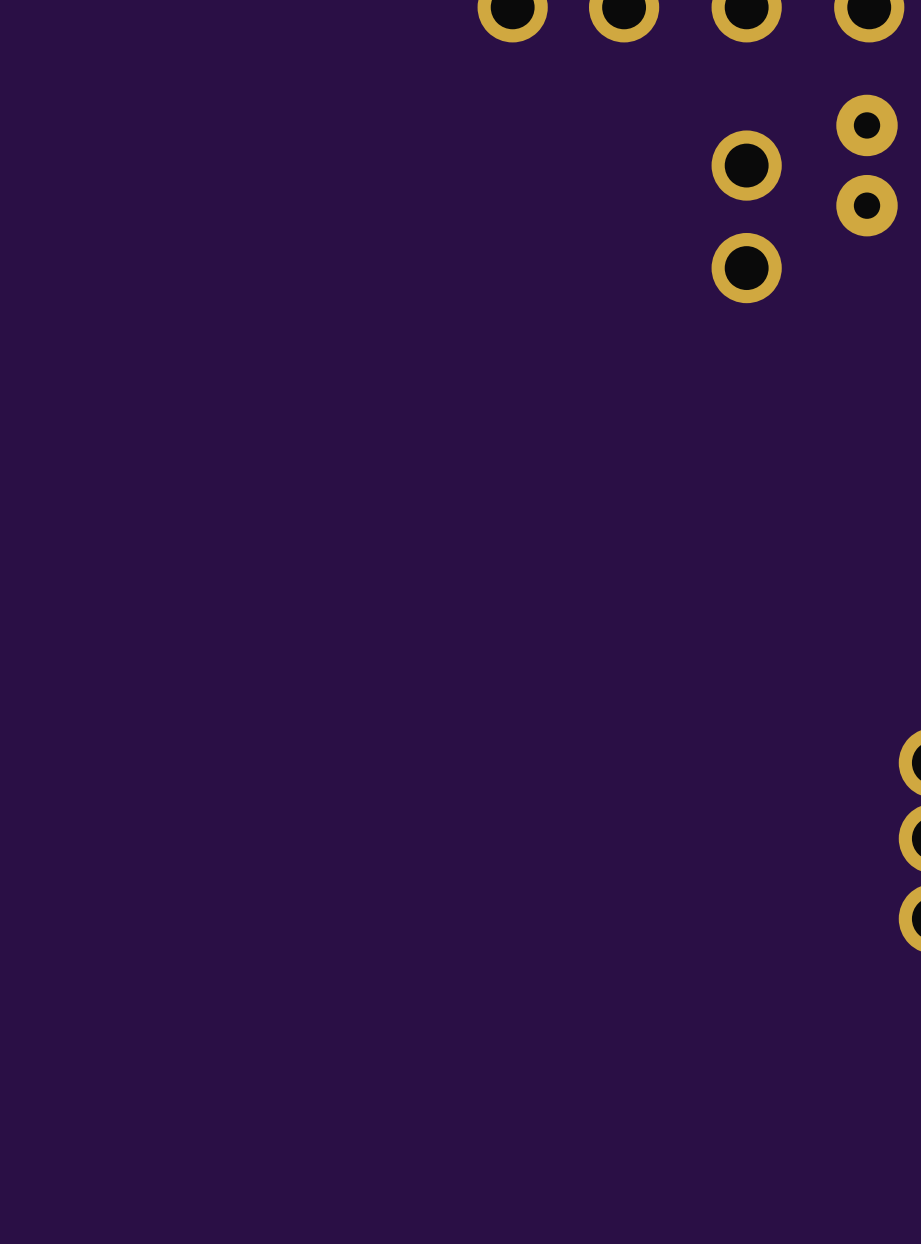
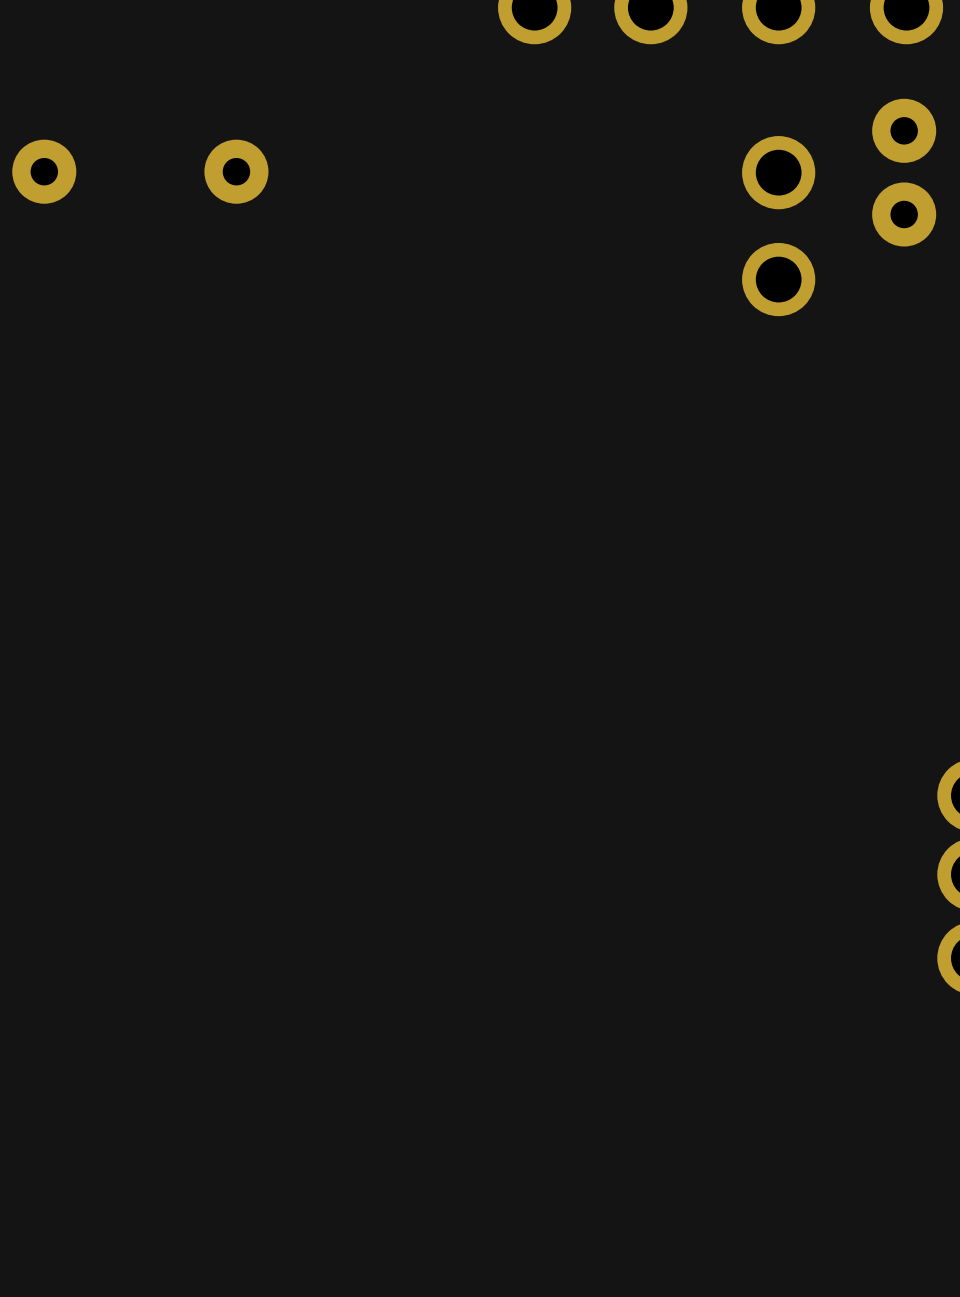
via: none -> (44, 171)
via: none -> (236, 171)

